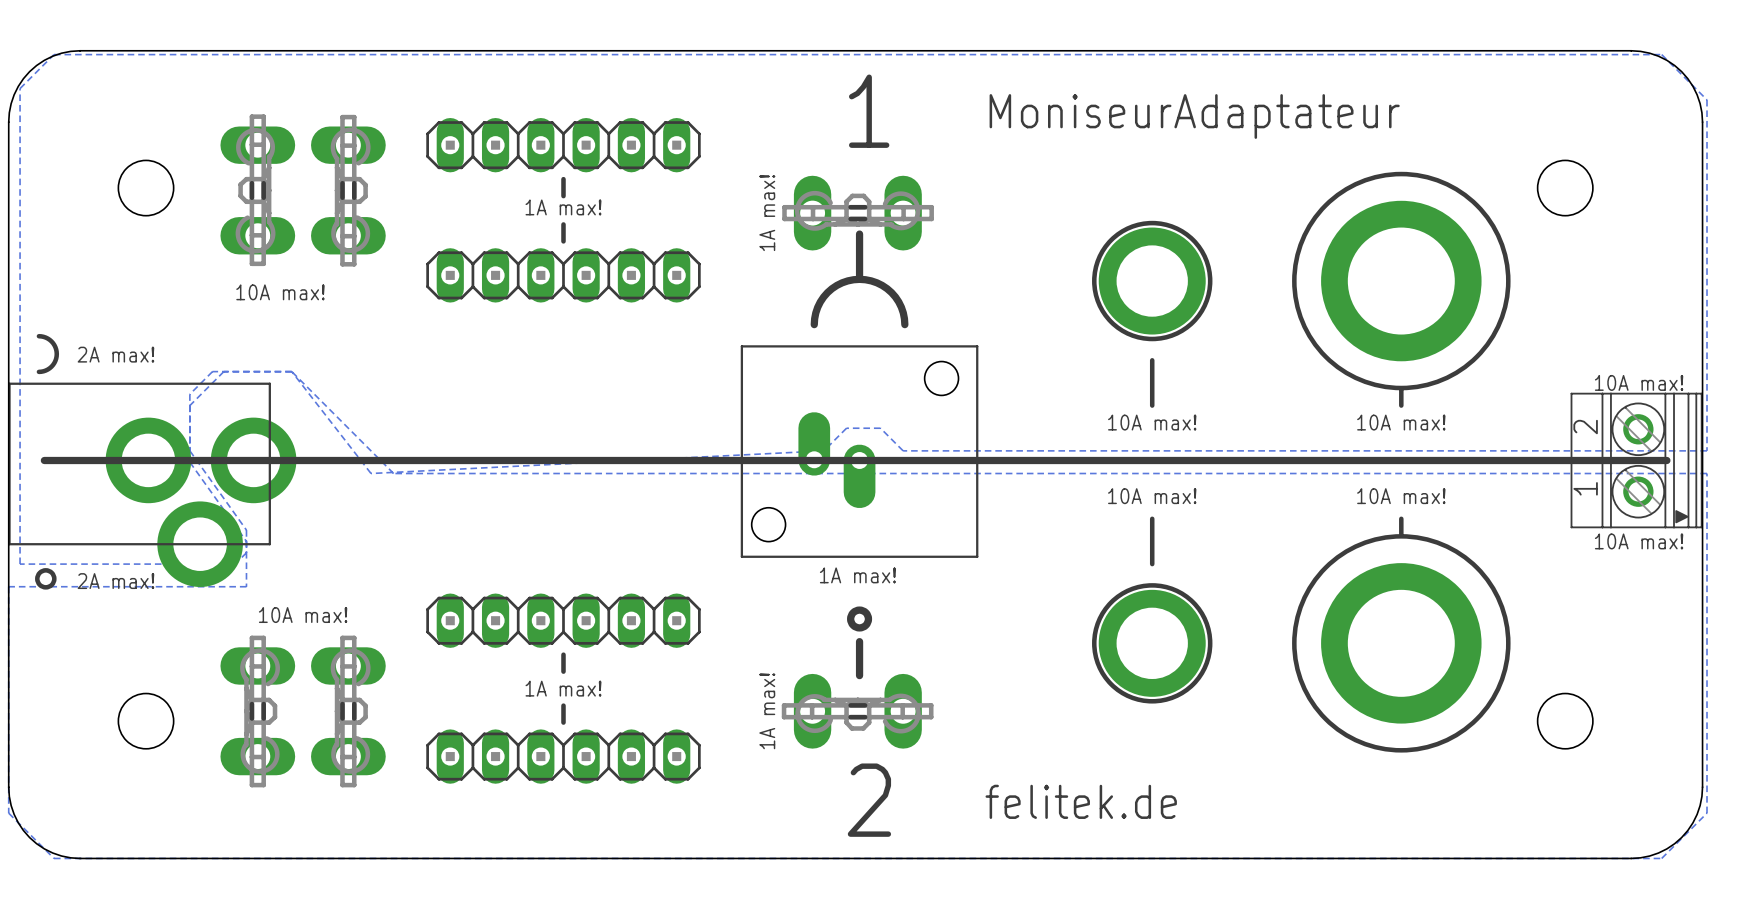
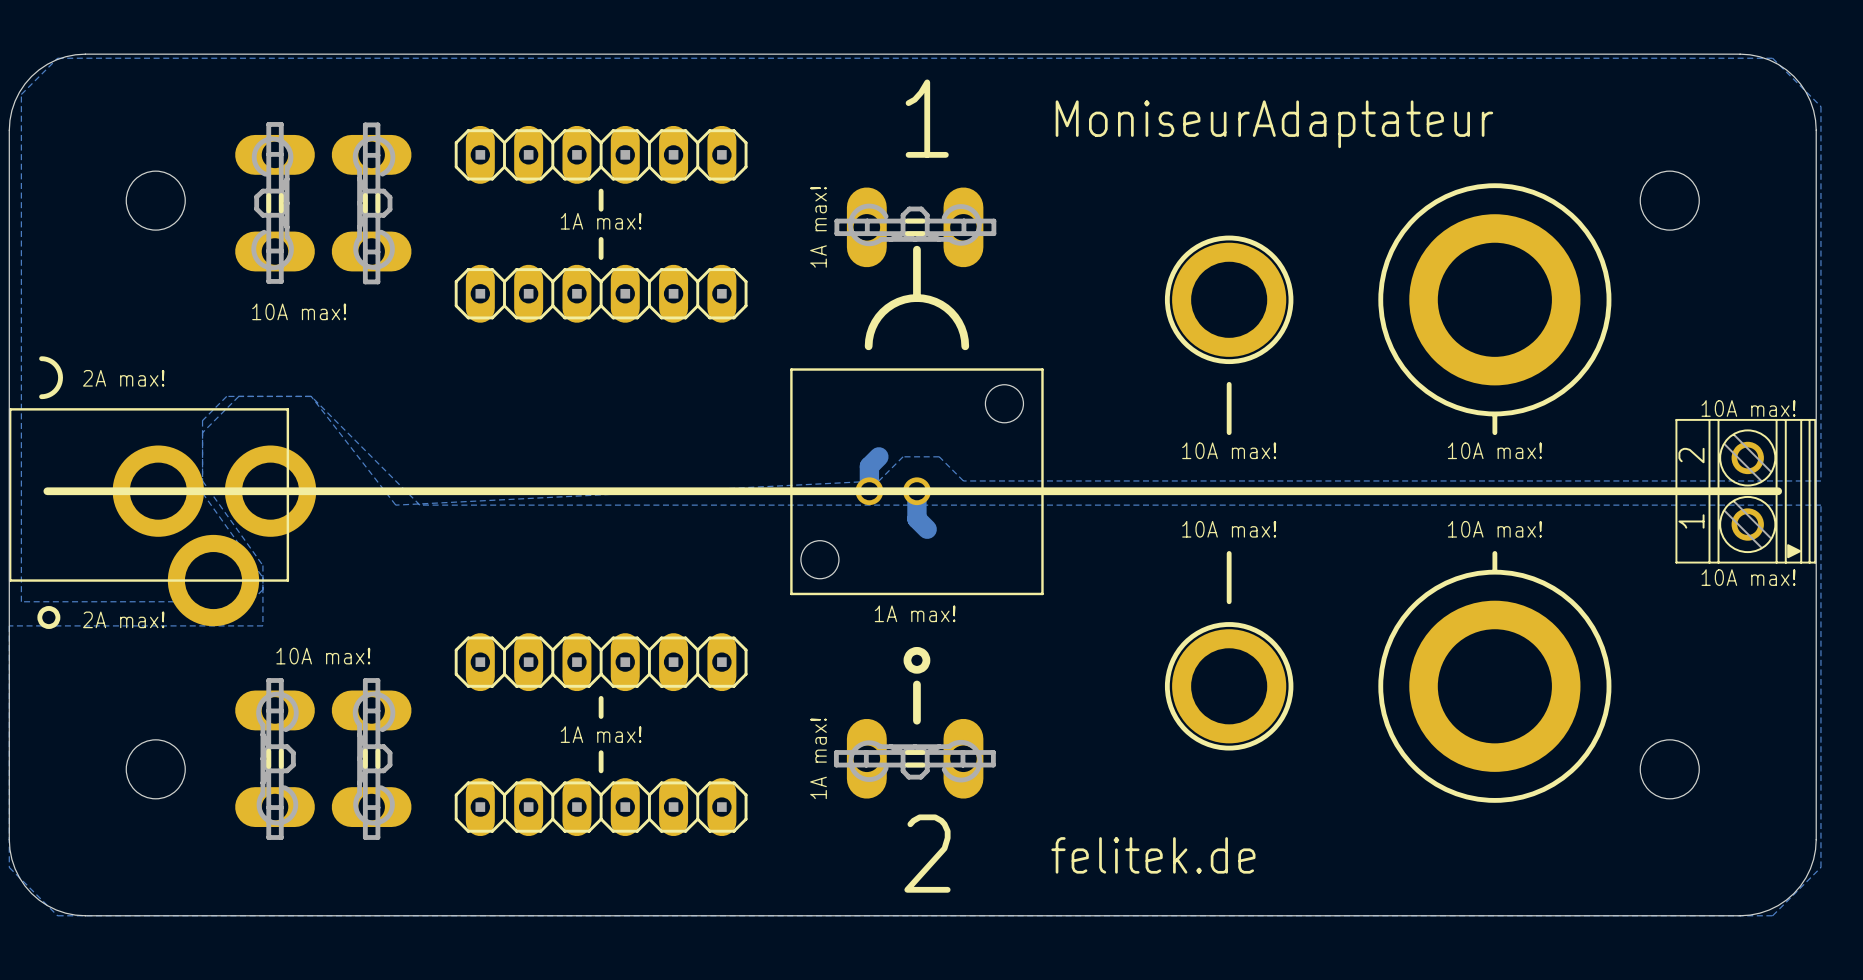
part footprint: [740, 345, 979, 558] -> [790, 368, 1044, 596]
bottom track: none -> (878, 456) (869, 466) (869, 491)
bottom track: none -> (916, 491) (916, 519) (927, 529)

